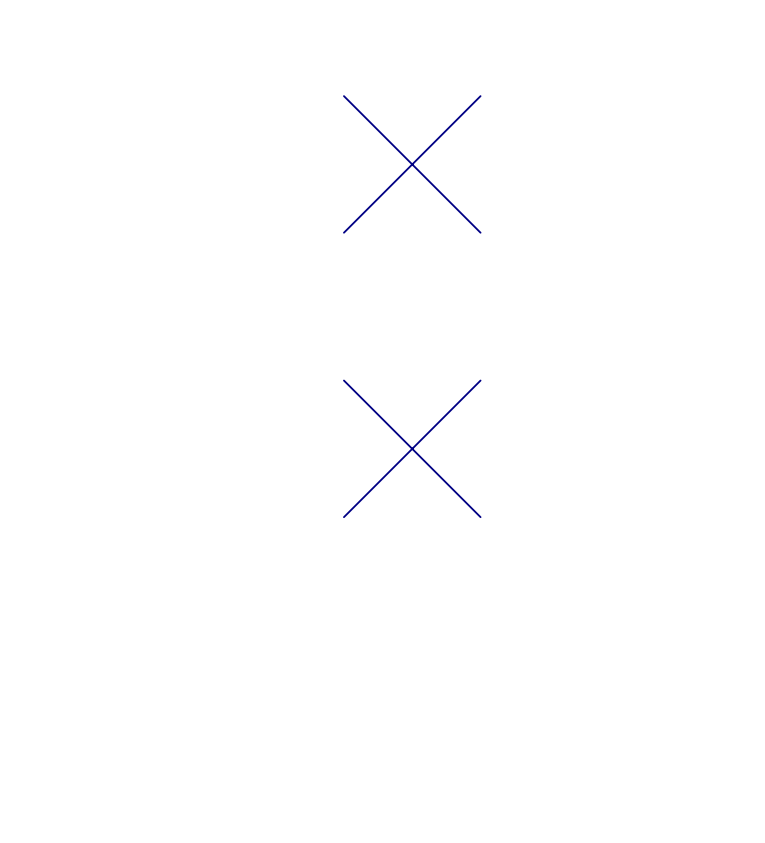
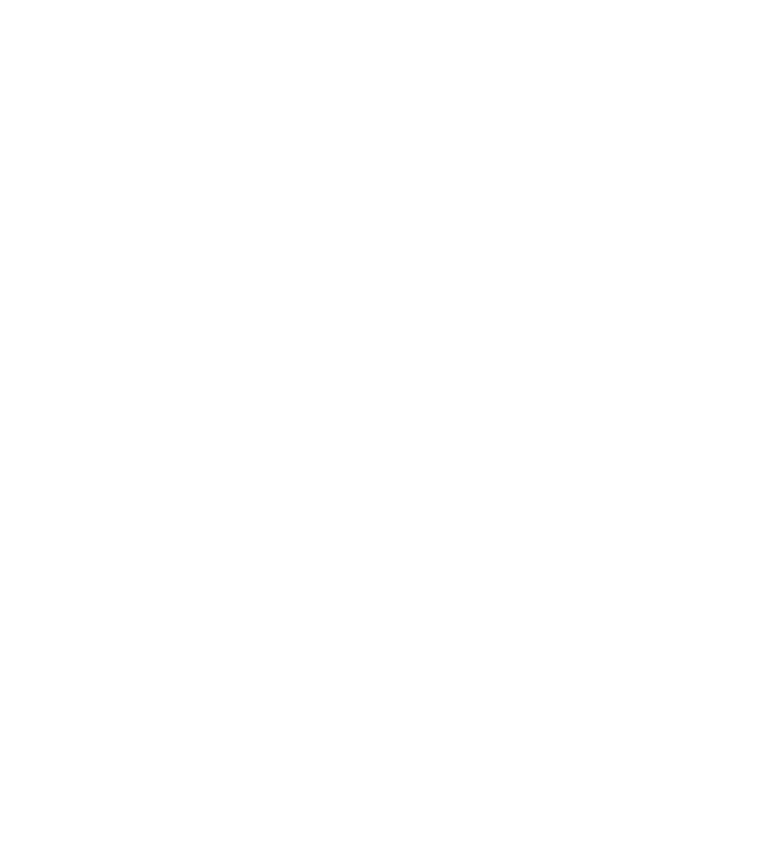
no-connect mark: (412, 164) -> none
no-connect mark: (412, 448) -> none

